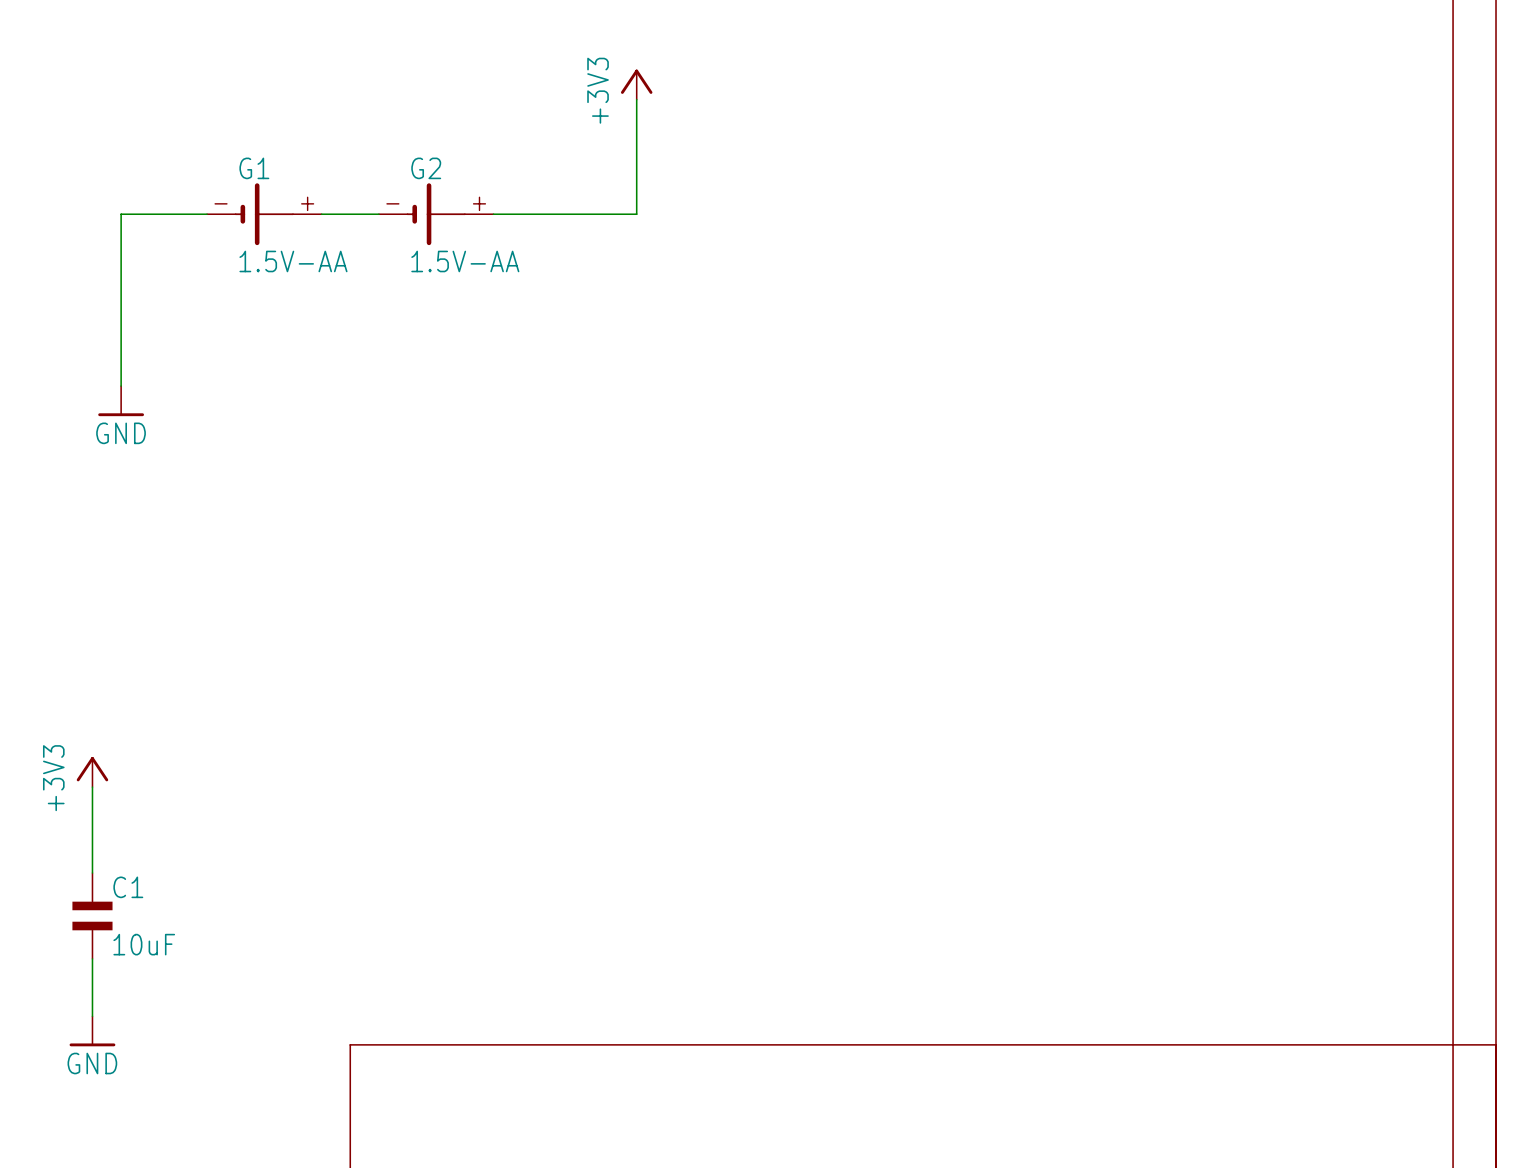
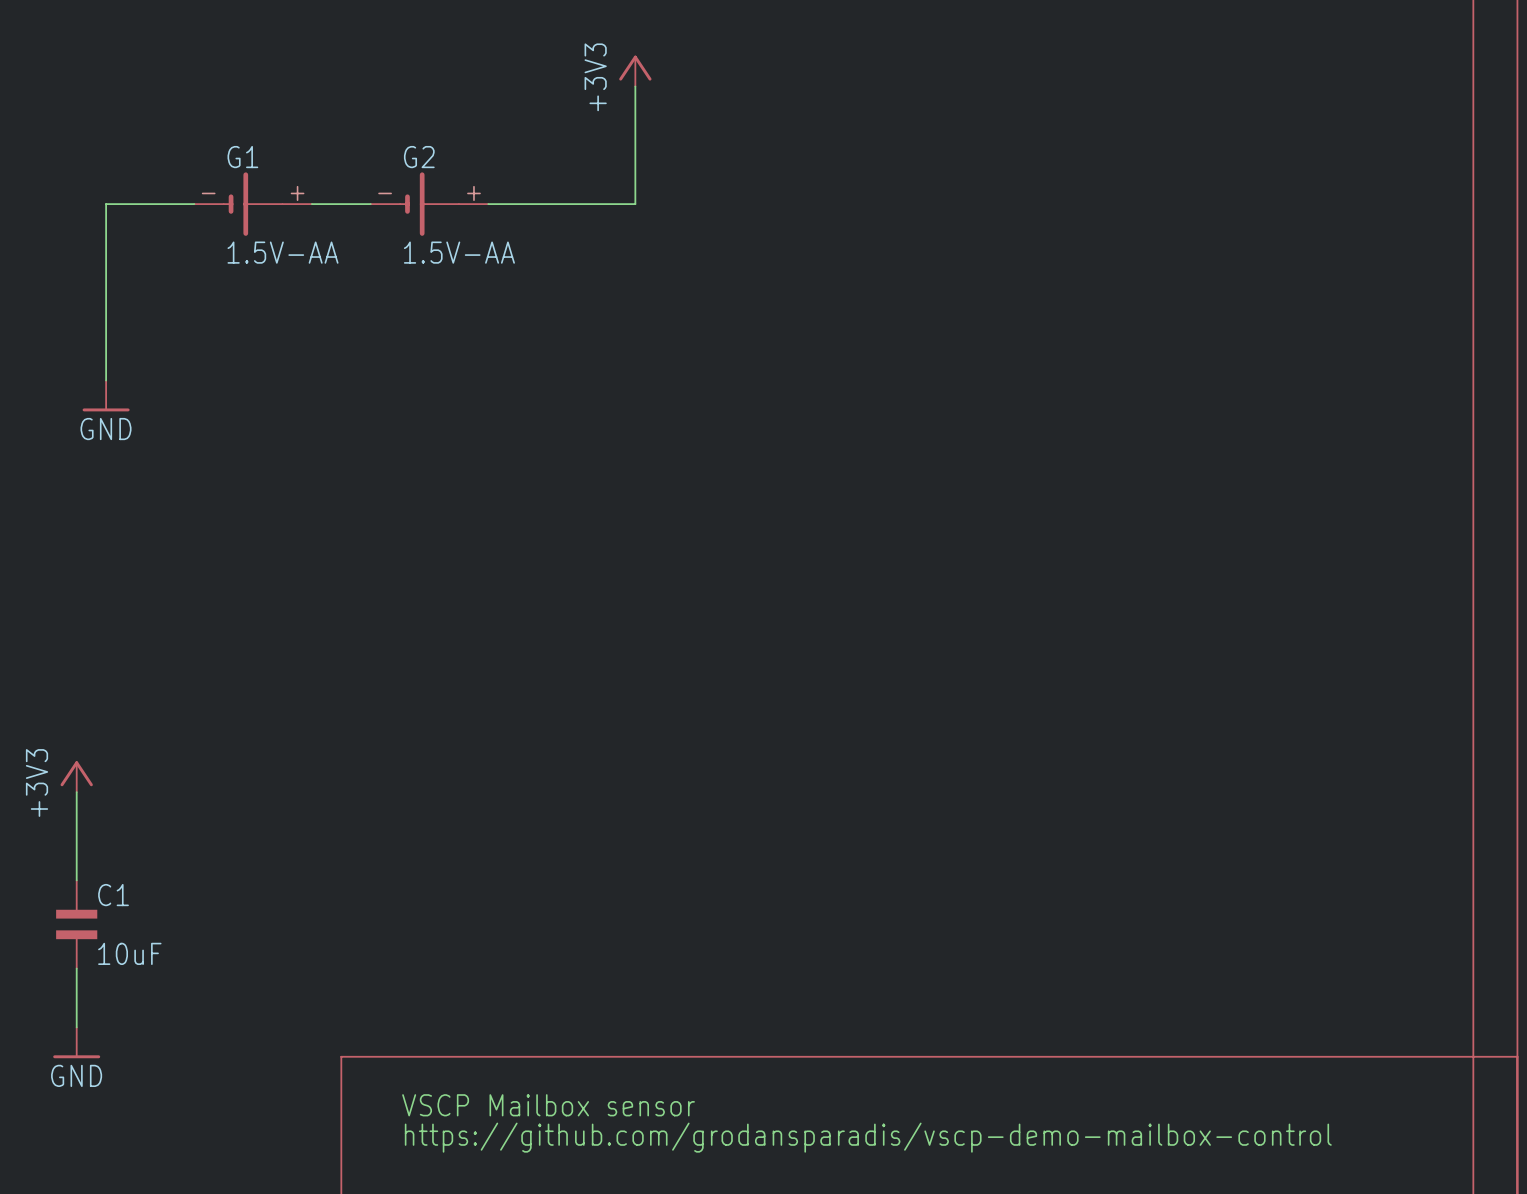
text: none -> VSCP Mailbox sensor (548, 1105)
text: none -> https://github.com/grodansparadis/vscp-demo-mailbox-control (868, 1137)

